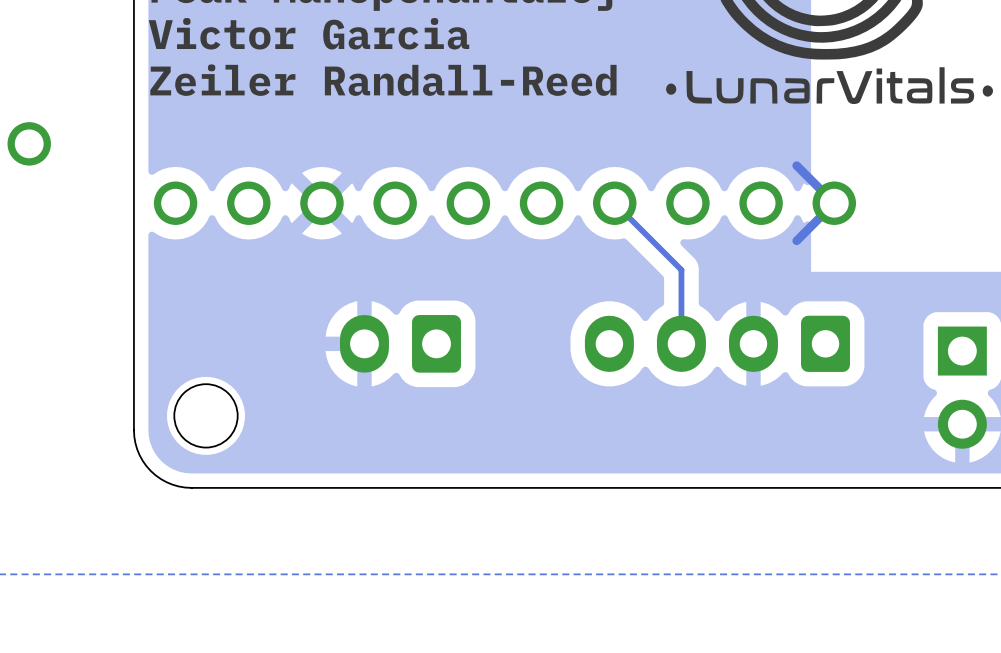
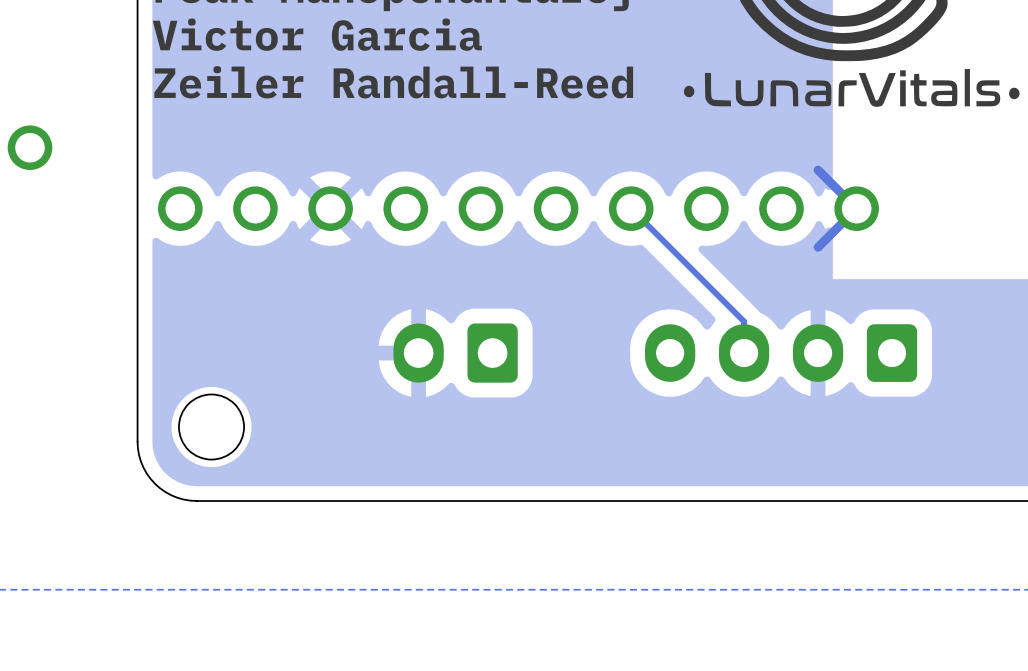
track: (681, 269) (681, 343) -> (699, 277) (744, 321) (744, 353)
part position: (400, 343) -> (455, 353)
part position: (717, 343) -> (781, 353)
part: (962, 387) -> none

